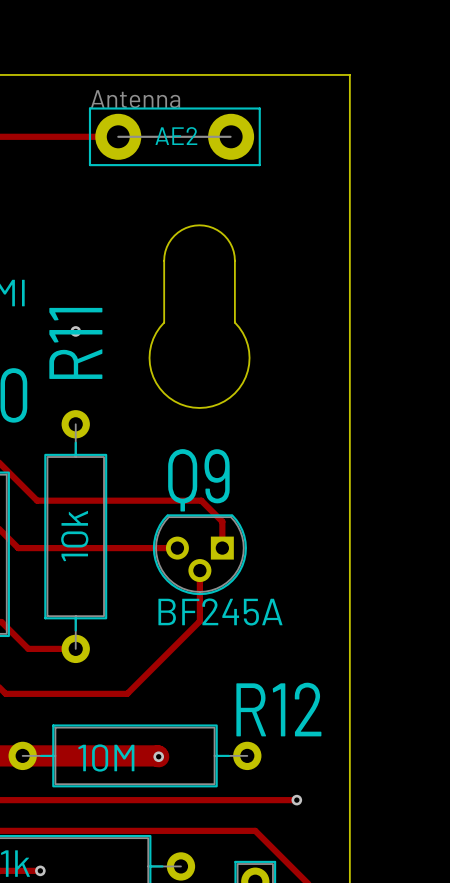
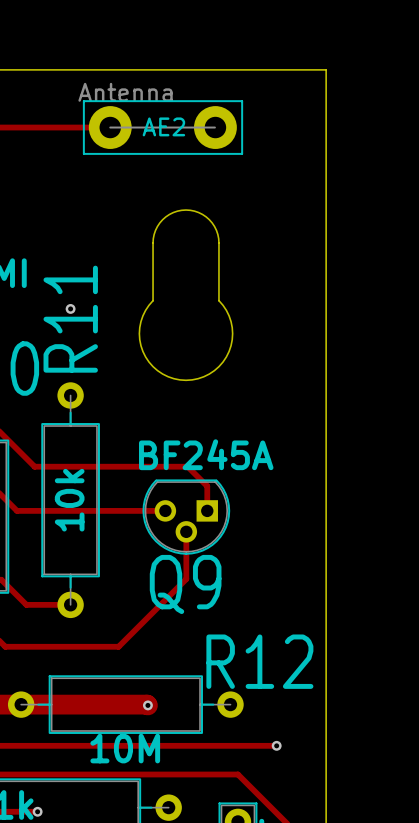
Q9 name position: Q9 (198, 480) -> Q9 (185, 584)
Q9 value position: BF245A (220, 611) -> BF245A (206, 454)
R12 value position: 10M (106, 758) -> 10M (125, 748)

